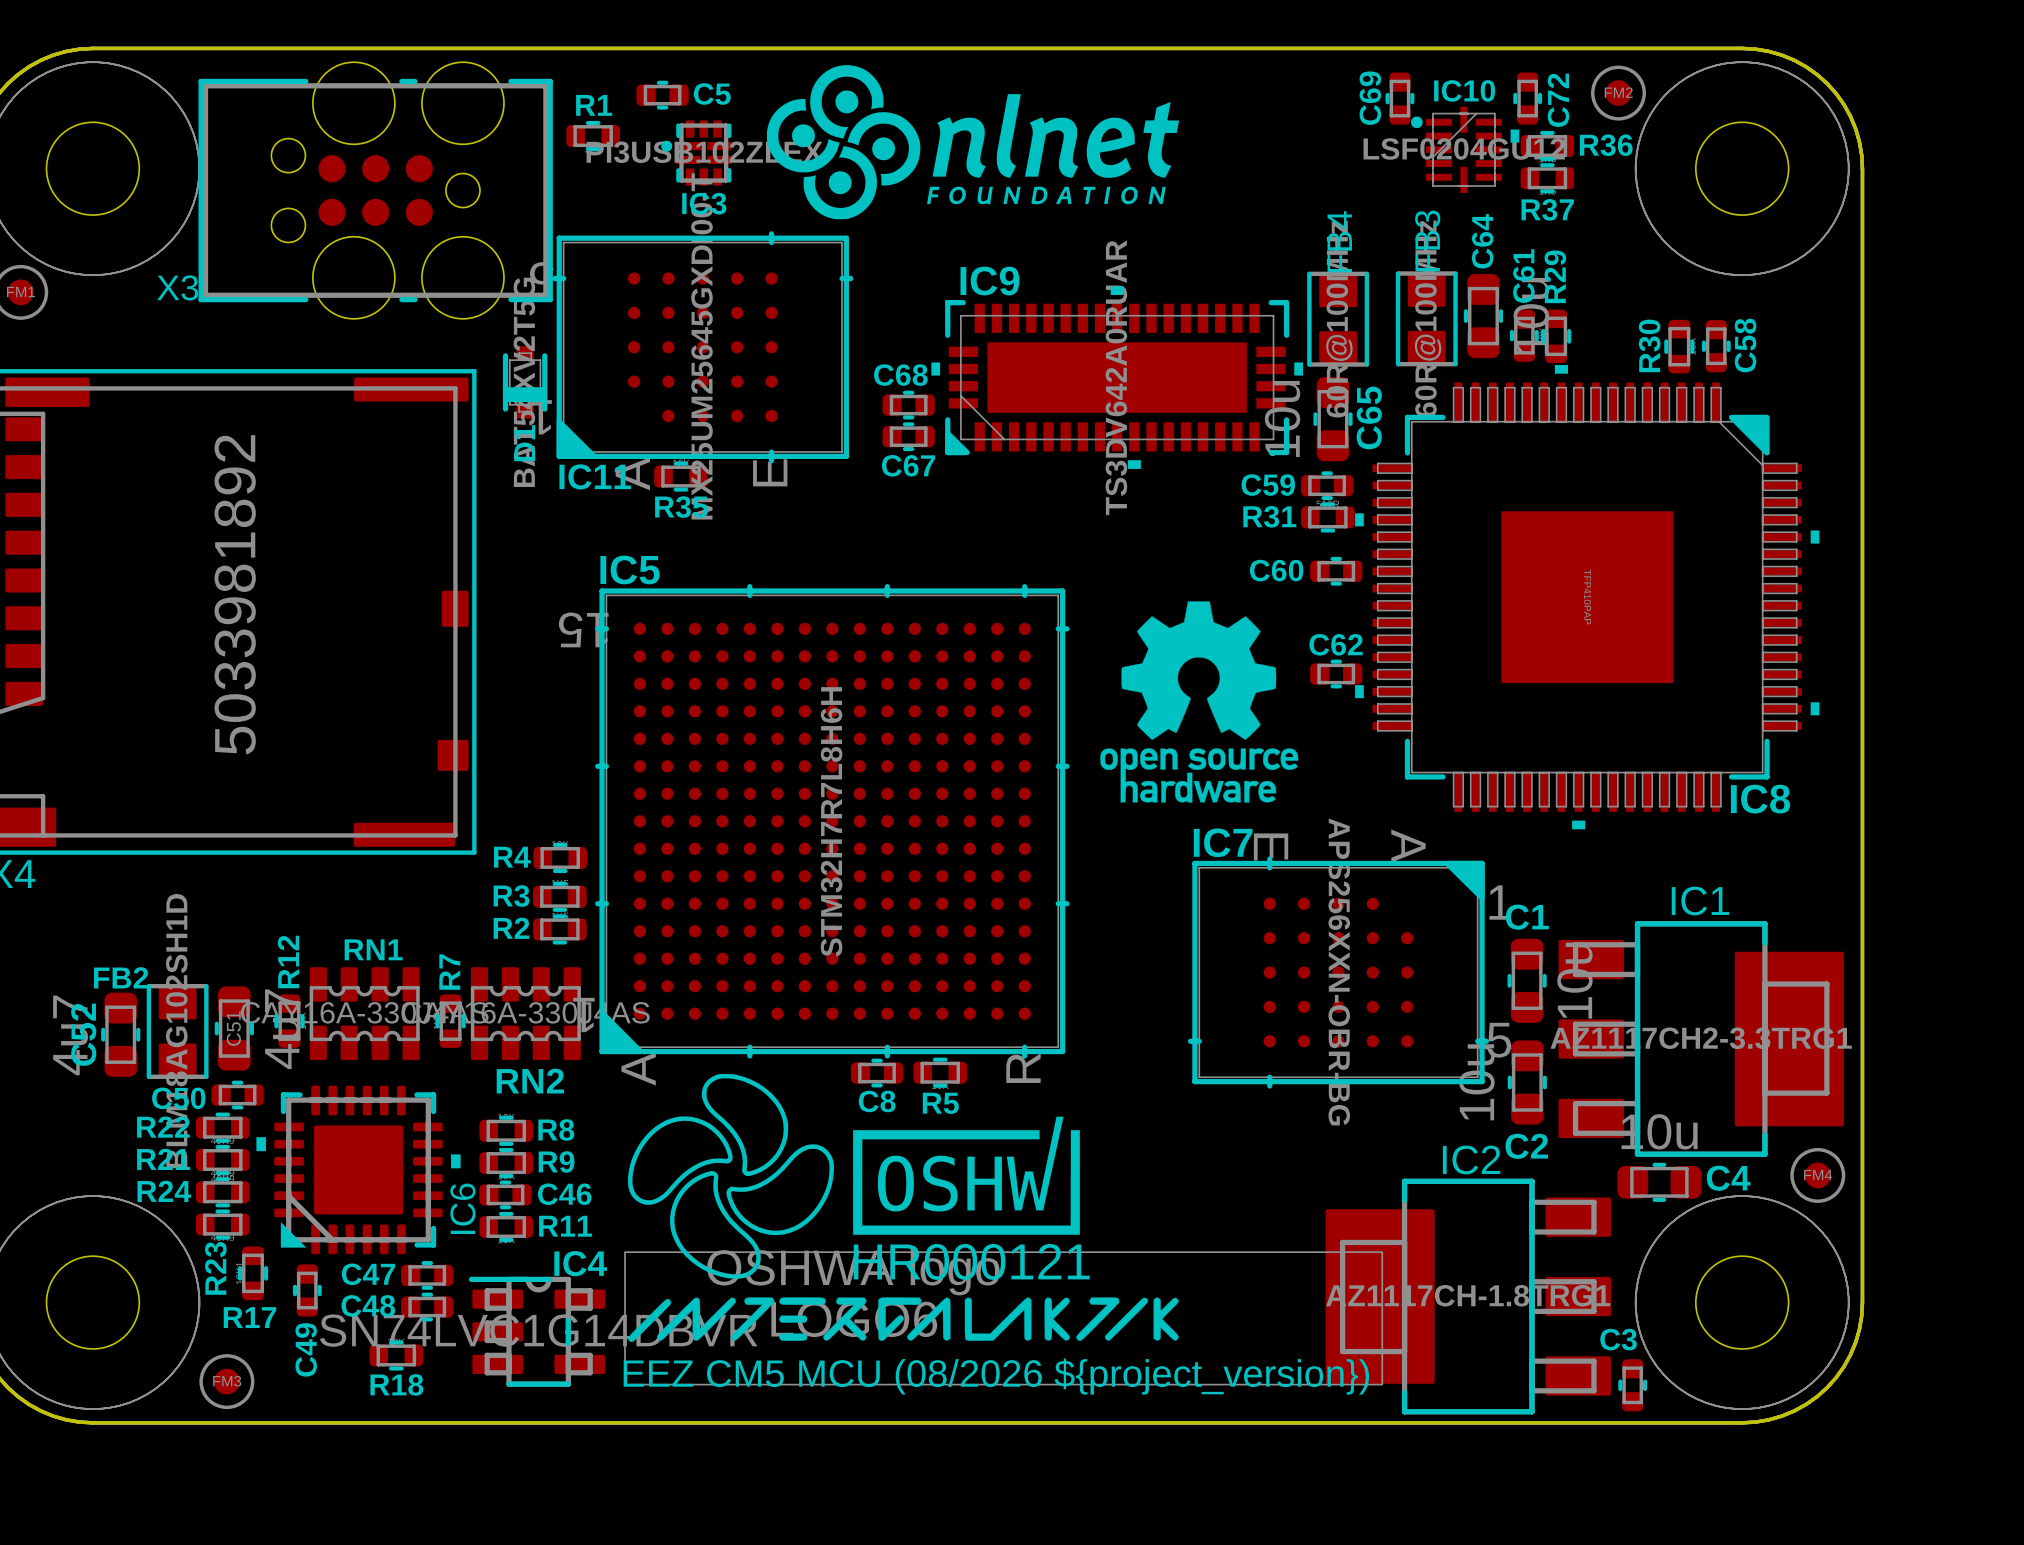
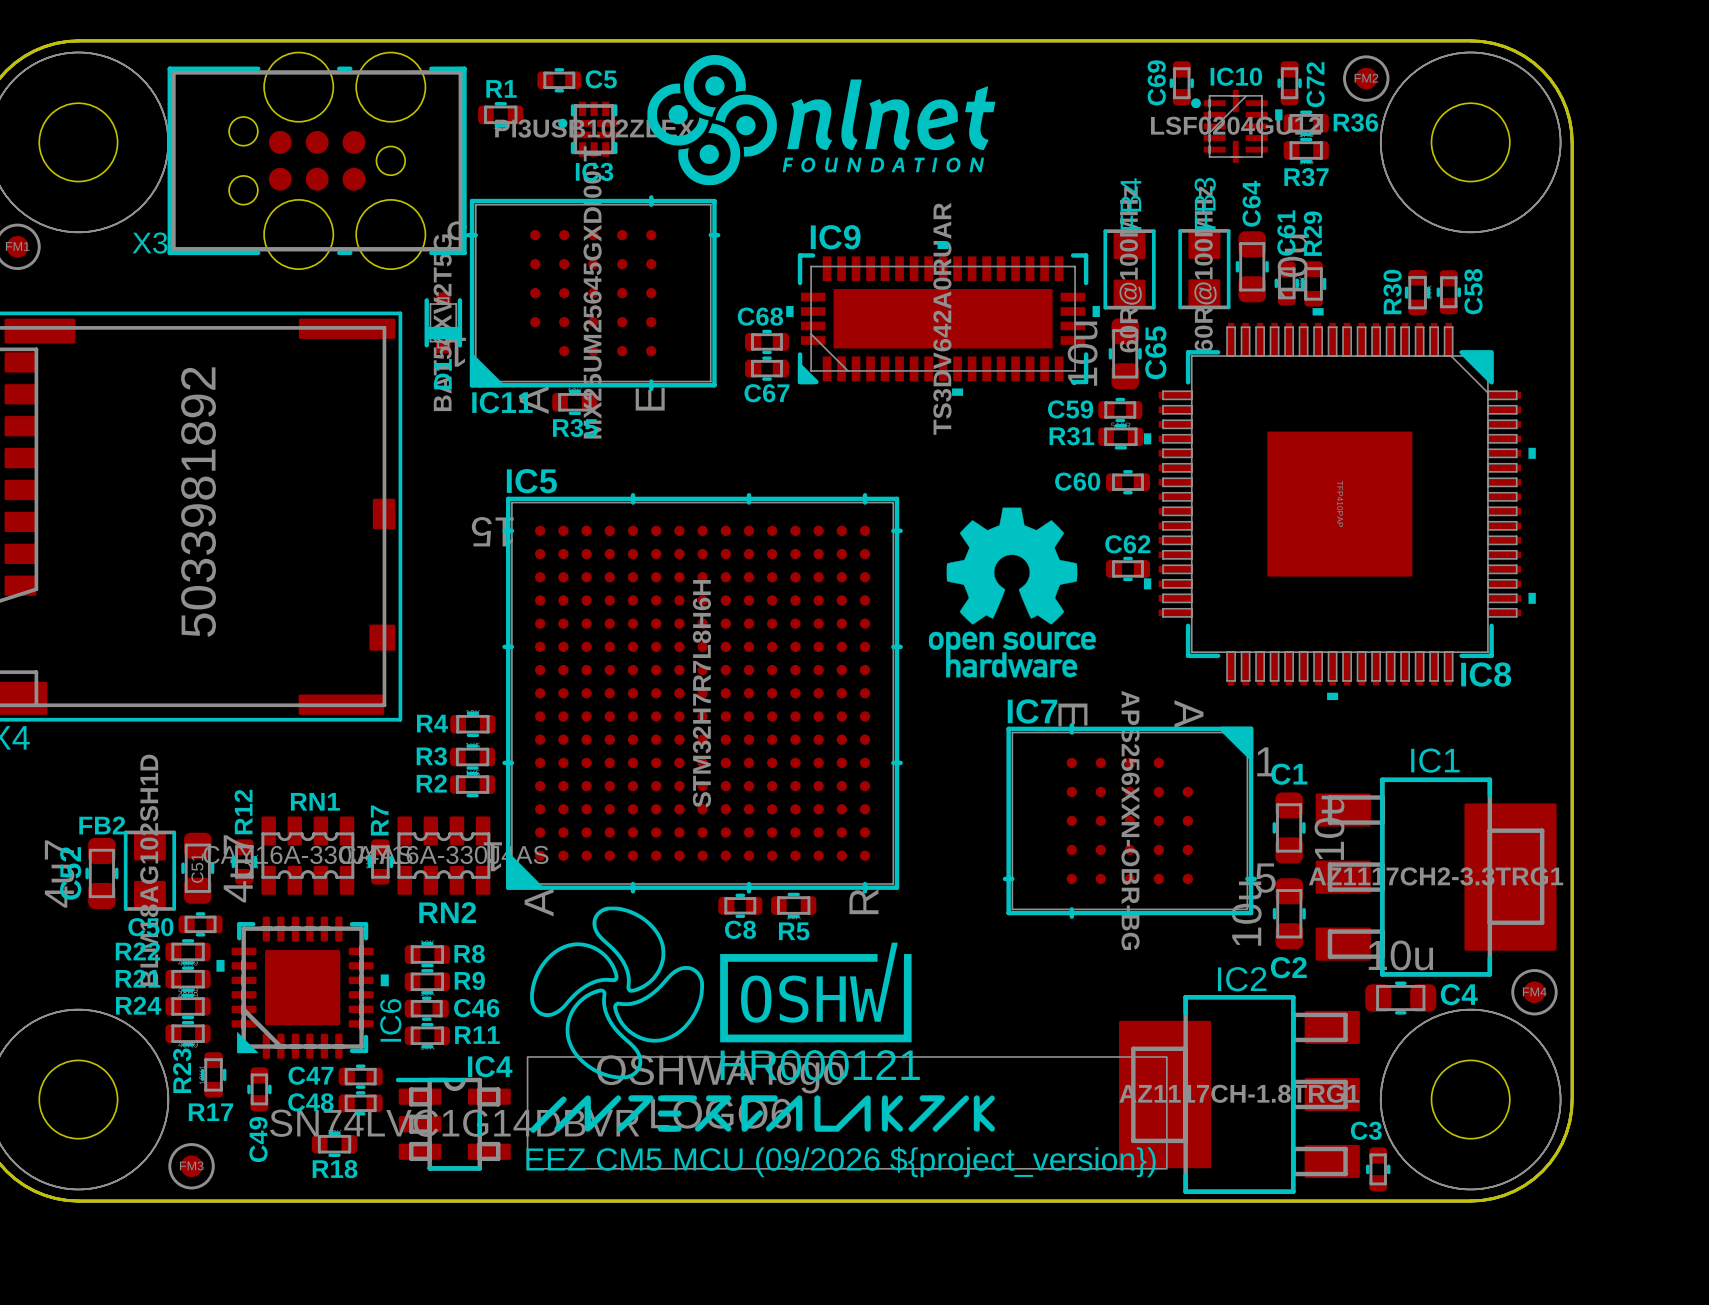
text: EEZ CM5 MCU (08/2026 ${project_version}) (996, 1376) -> EEZ CM5 MCU (09/2026 ${project_version}) (841, 1162)

